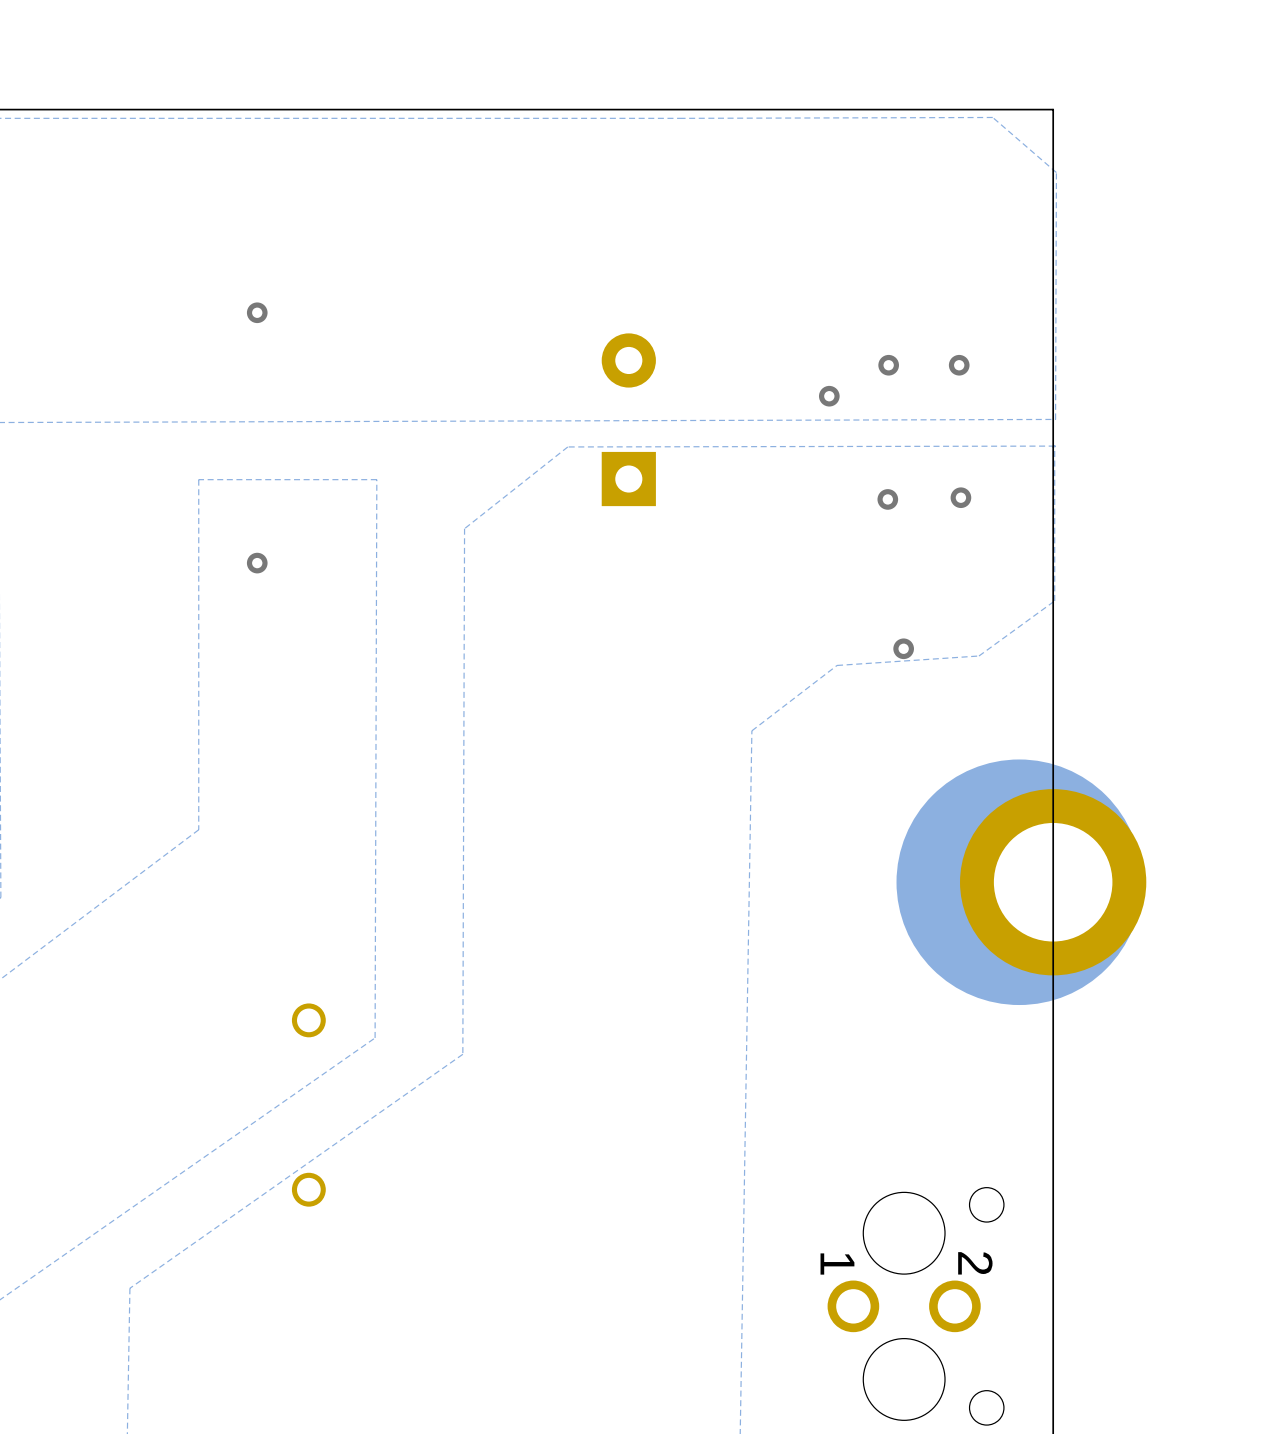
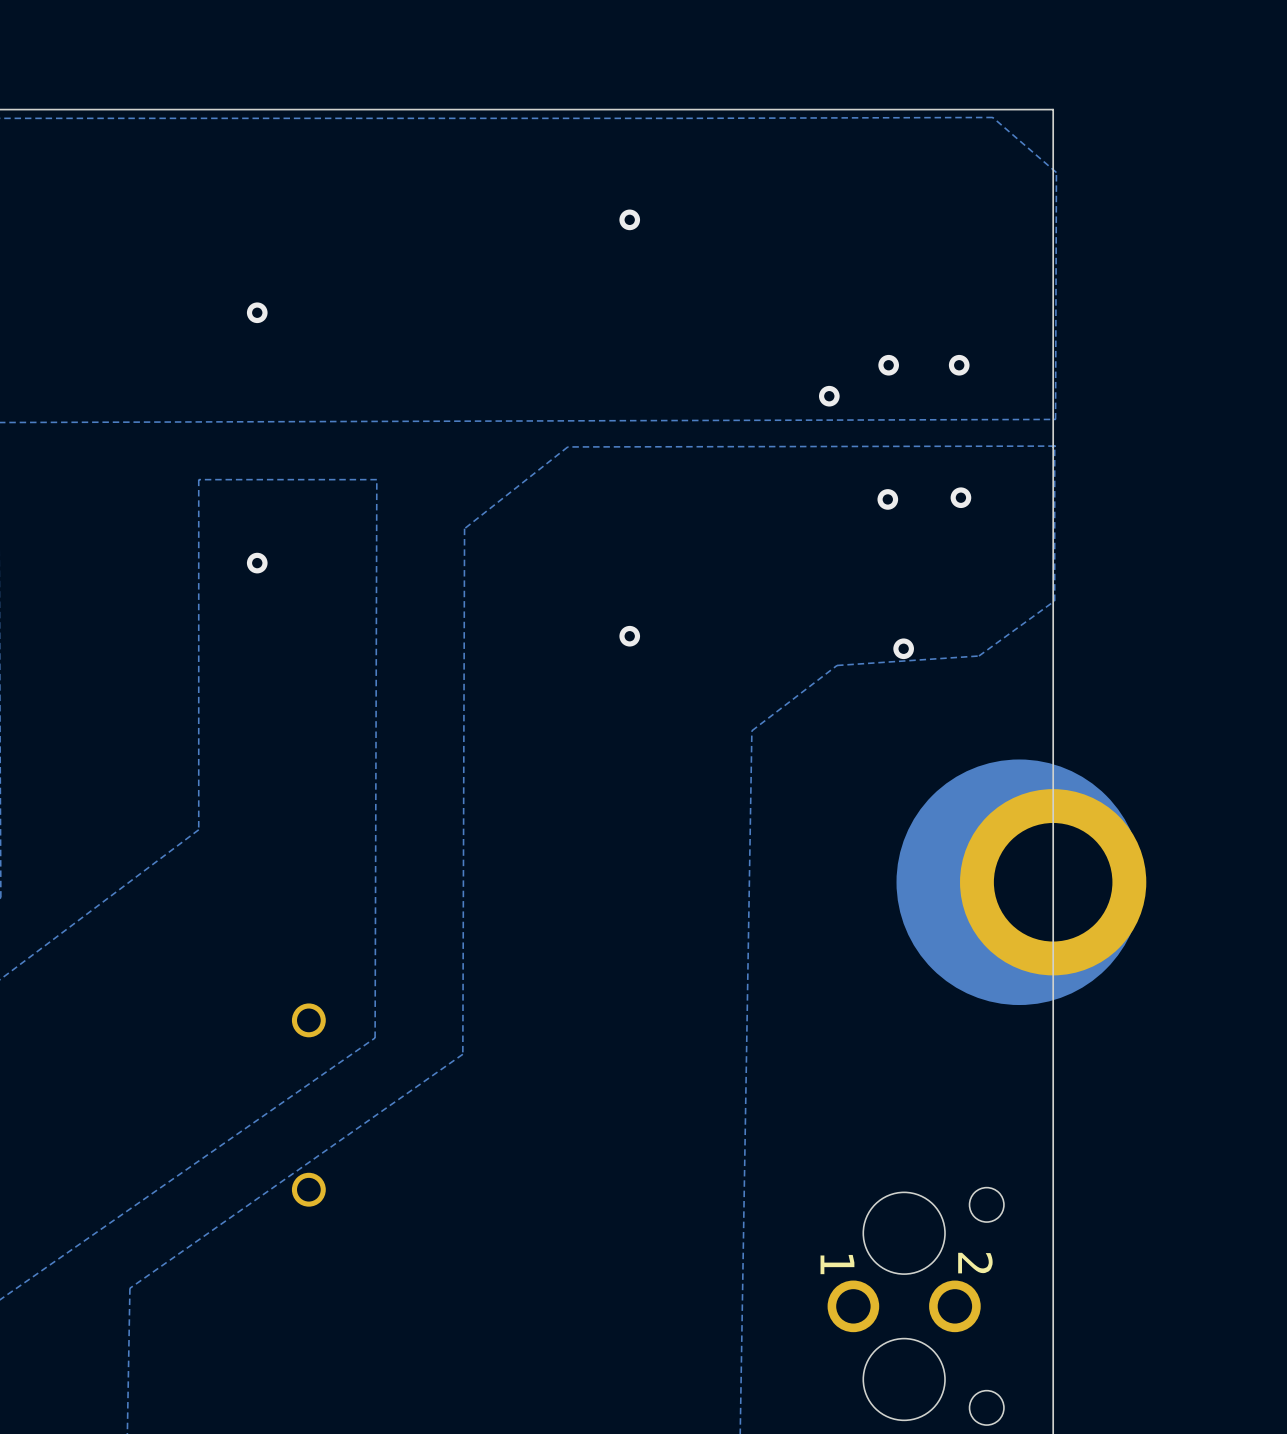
via: none -> (629, 219)
part: (628, 419) -> none
via: none -> (629, 636)

